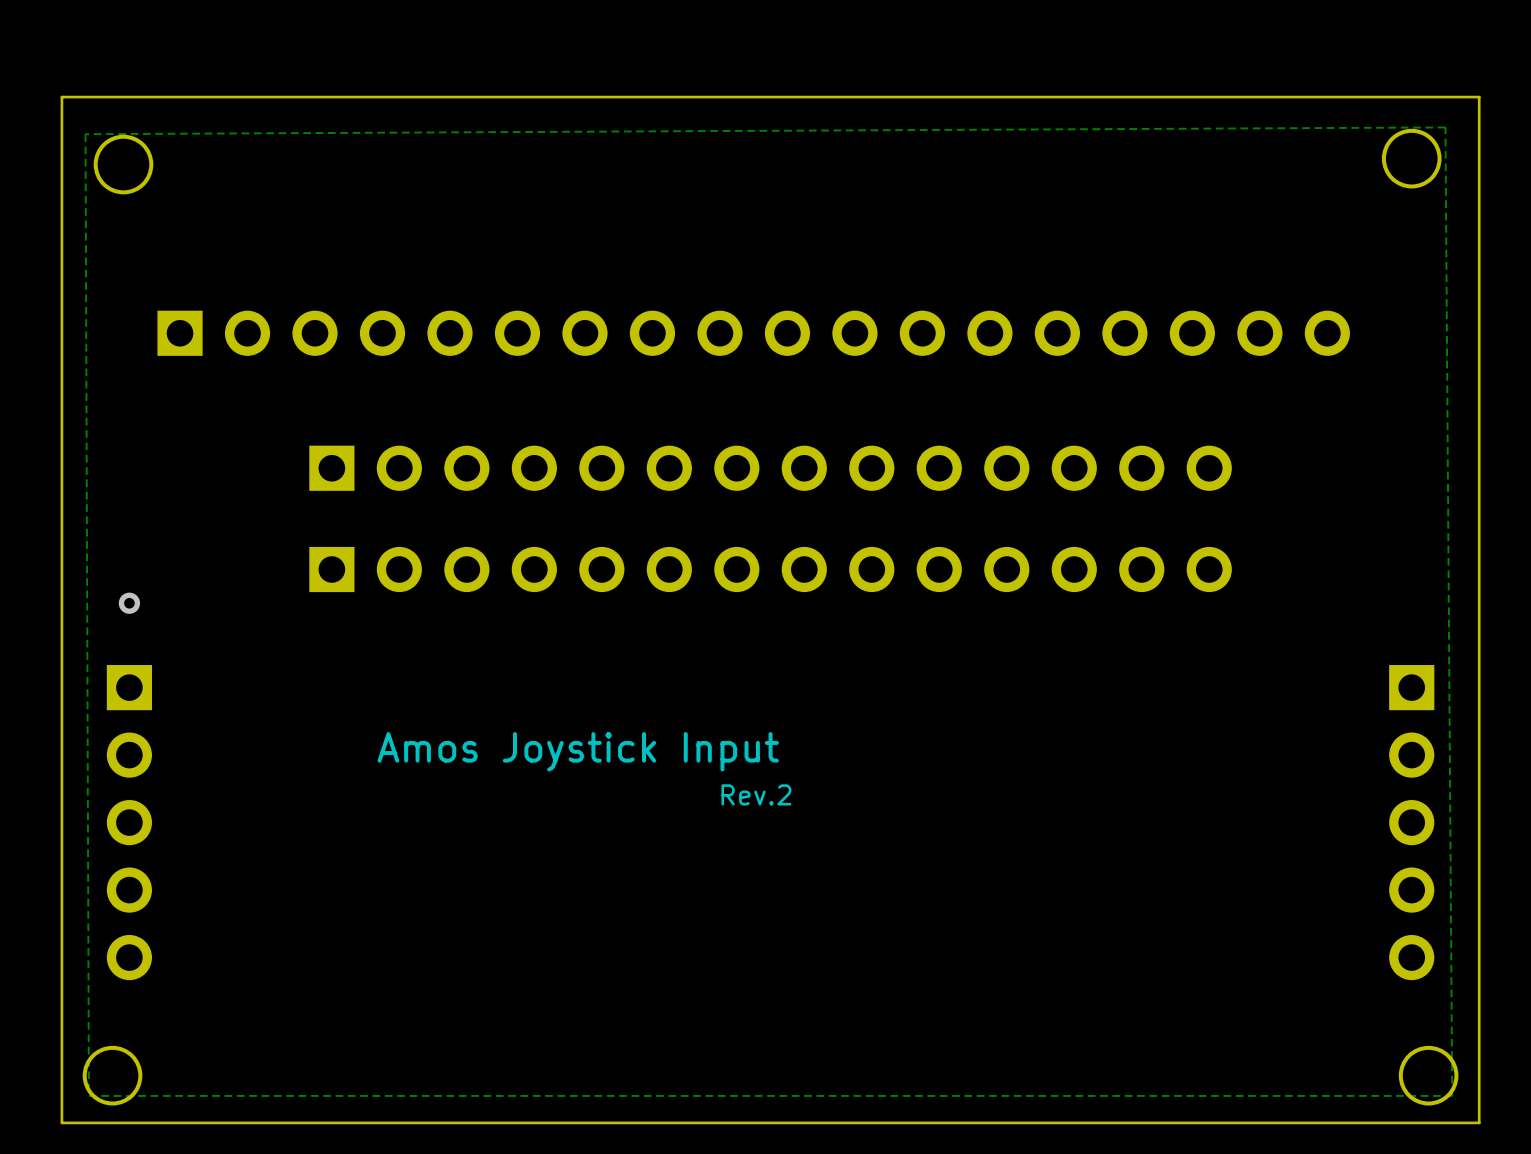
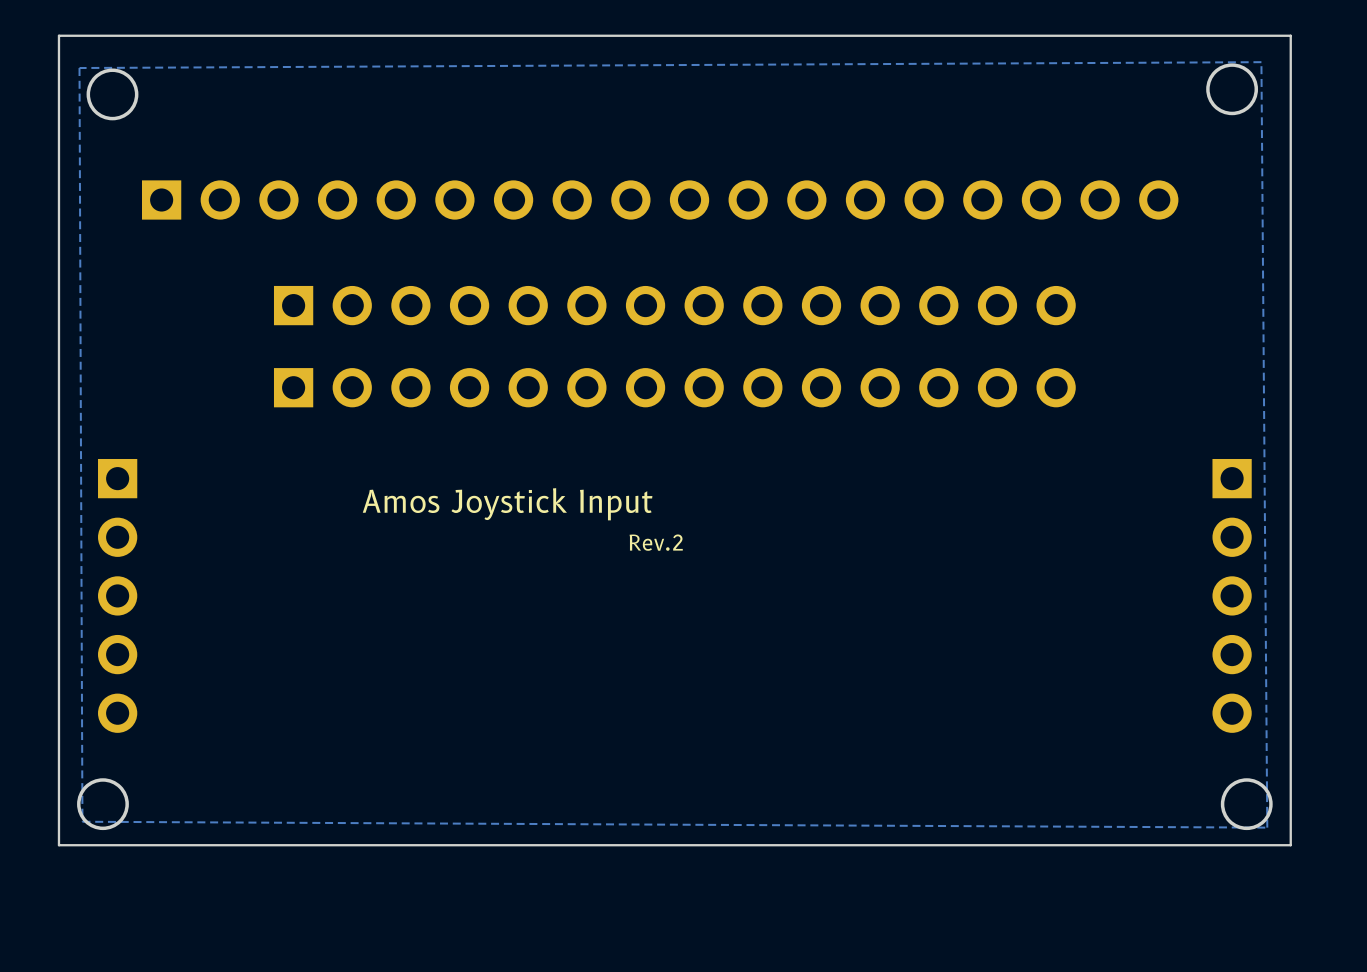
zone outline: (1445, 127) (1452, 1095) (88, 1095) (85, 134) -> (1261, 62) (1267, 827) (82, 821) (79, 68)
part position: (753, 333) -> (660, 200)
part: none -> (674, 305)
part: (770, 468) -> none
part: none -> (674, 387)
part: (770, 569) -> none
via: (129, 603) -> none
text position: Amos Joystick Input (578, 751) -> Amos Joystick Input (507, 504)
text position: Rev.2 (756, 794) -> Rev.2 (656, 542)
part position: (129, 822) -> (117, 595)
part position: (1411, 822) -> (1232, 595)
board edge: (1479, 1028) (1479, 1122) (61, 1122) (61, 1028) -> (1290, 845) (58, 845)
round board edge position: (112, 1075) -> (102, 804)
round board edge position: (1428, 1075) -> (1246, 804)

